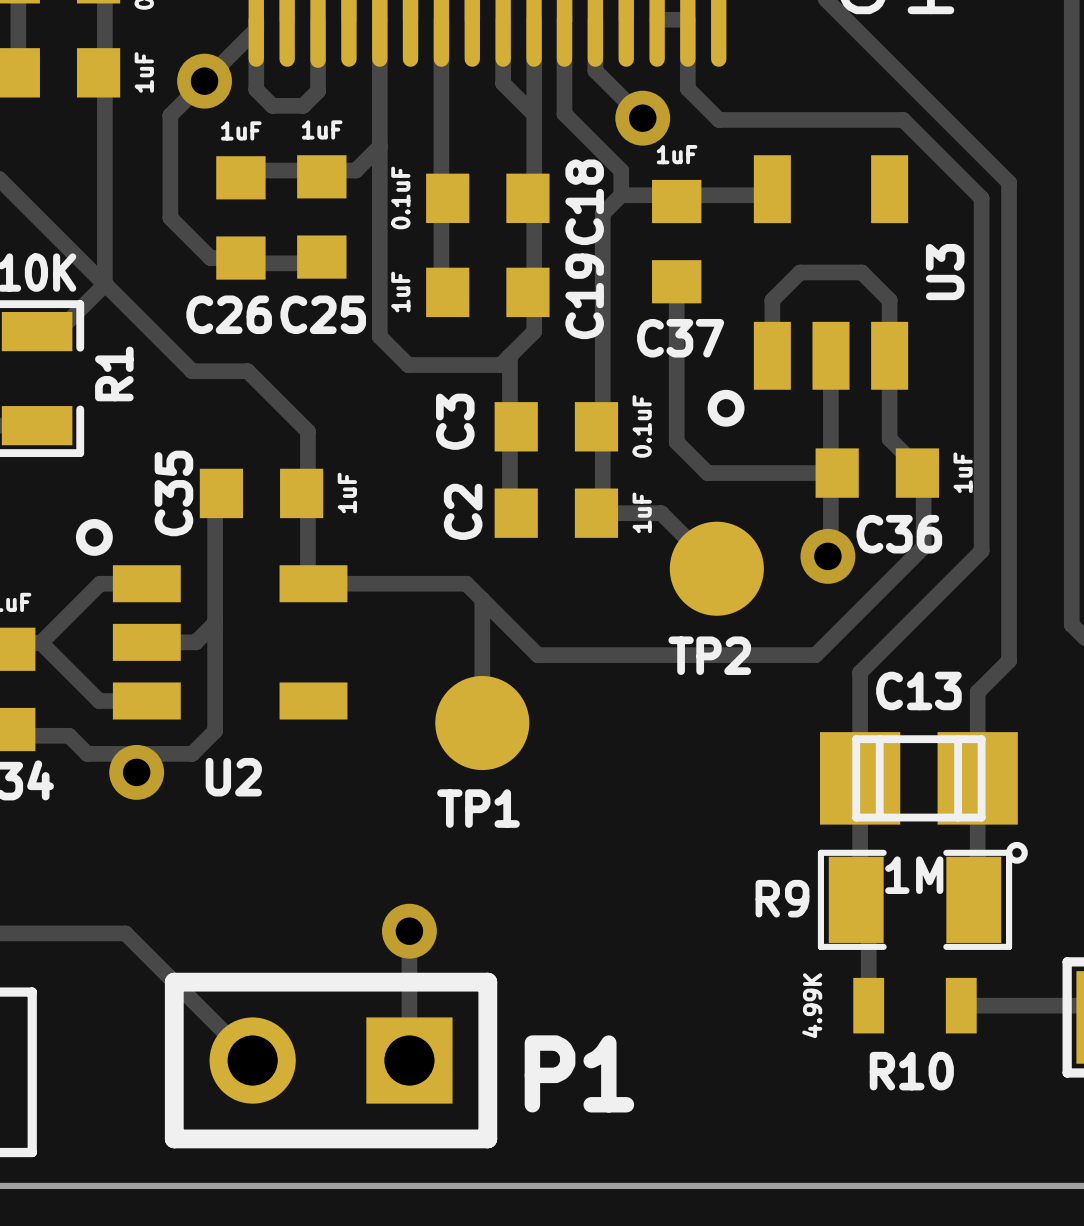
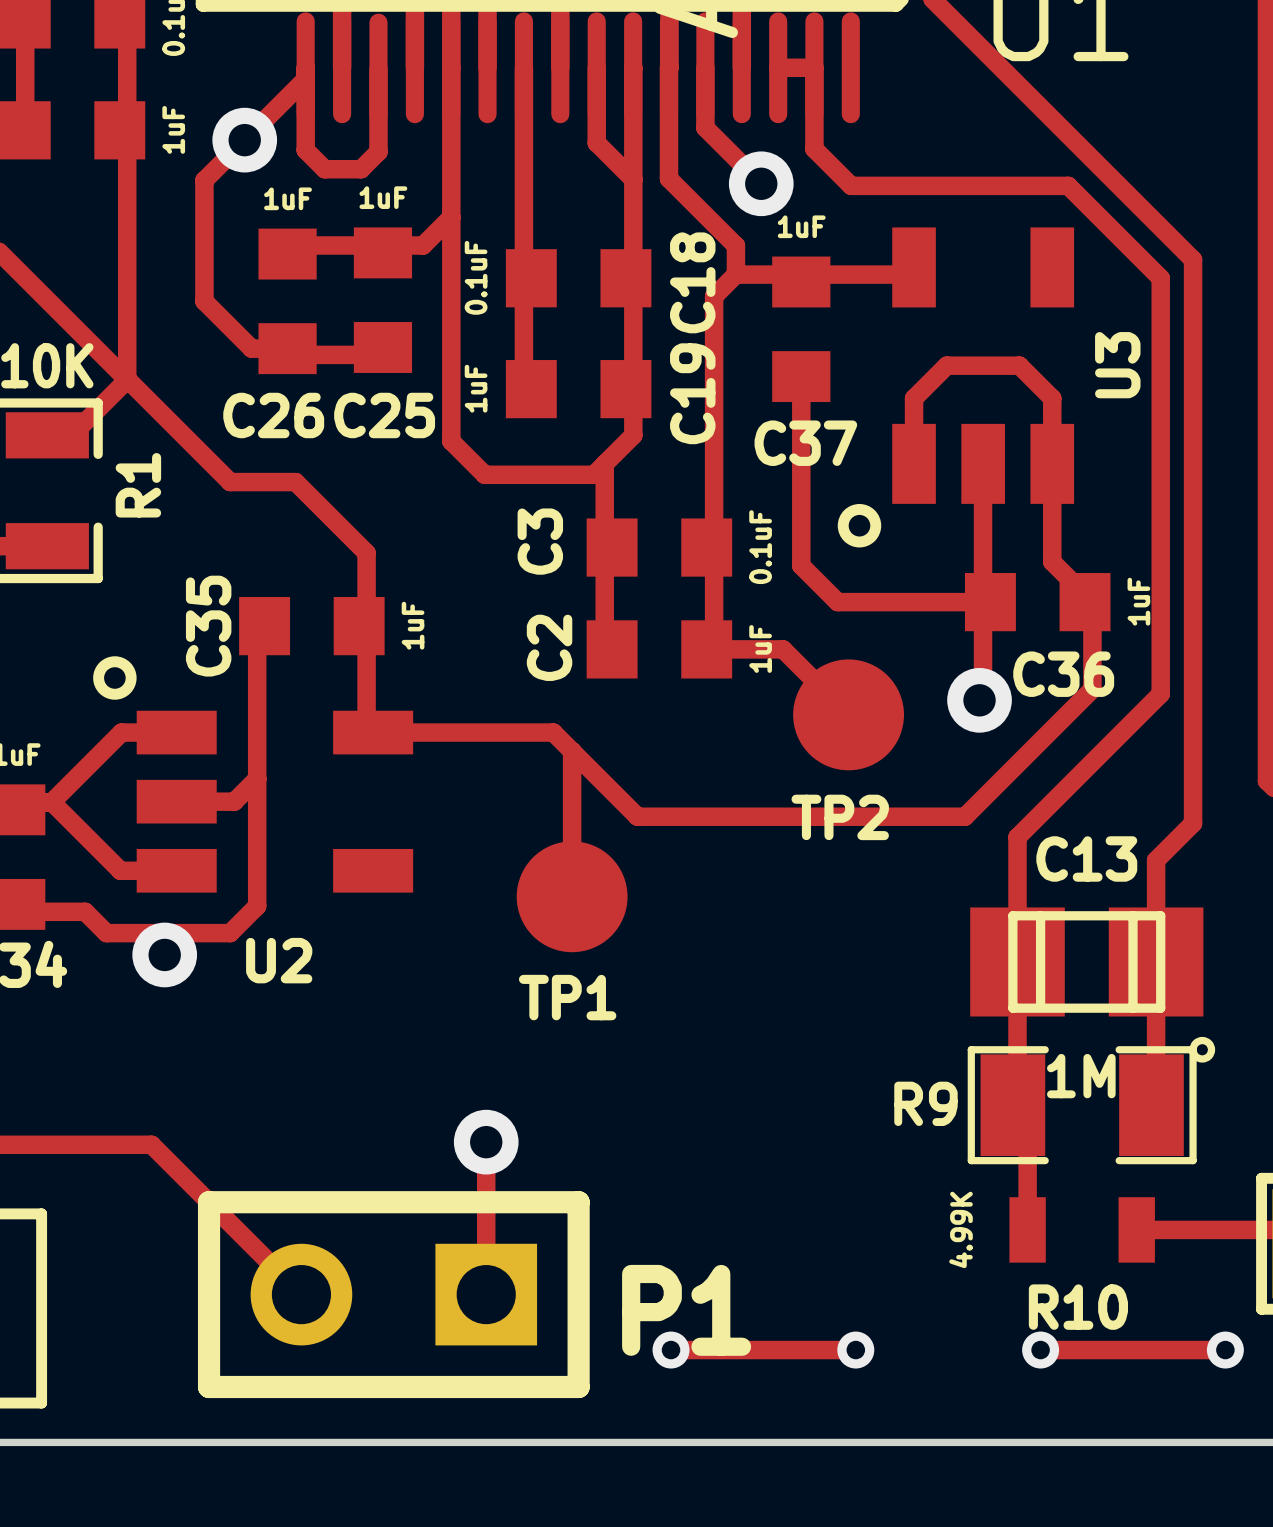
track: none -> (671, 1350) (855, 1350)
via: none -> (671, 1350)
via: none -> (855, 1350)
track: none -> (1040, 1350) (1225, 1350)
via: none -> (1040, 1350)
via: none -> (1225, 1350)

